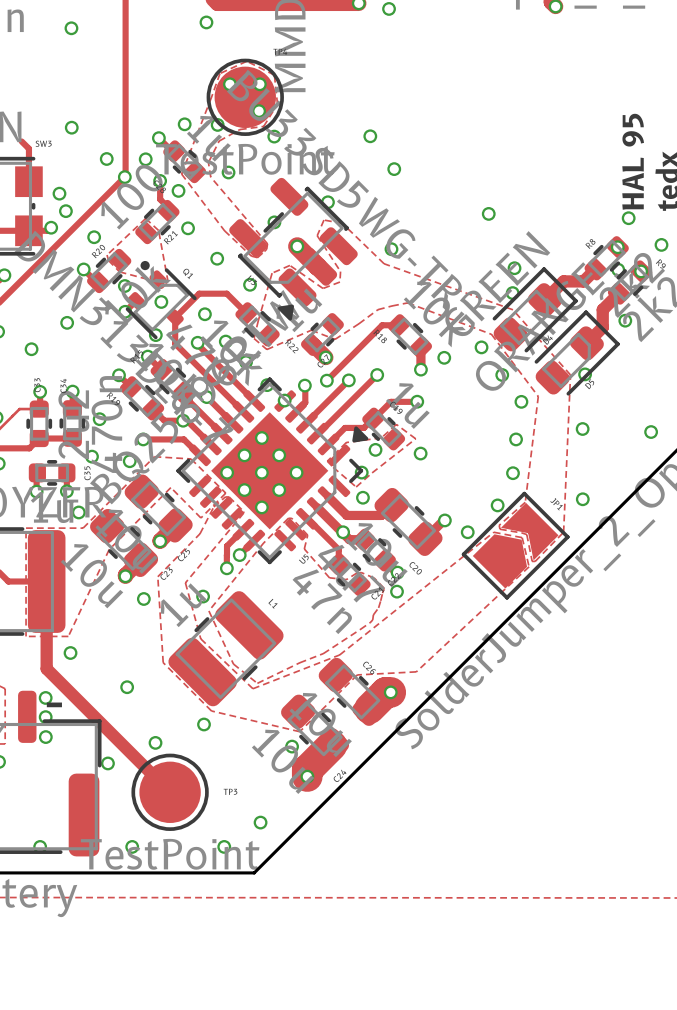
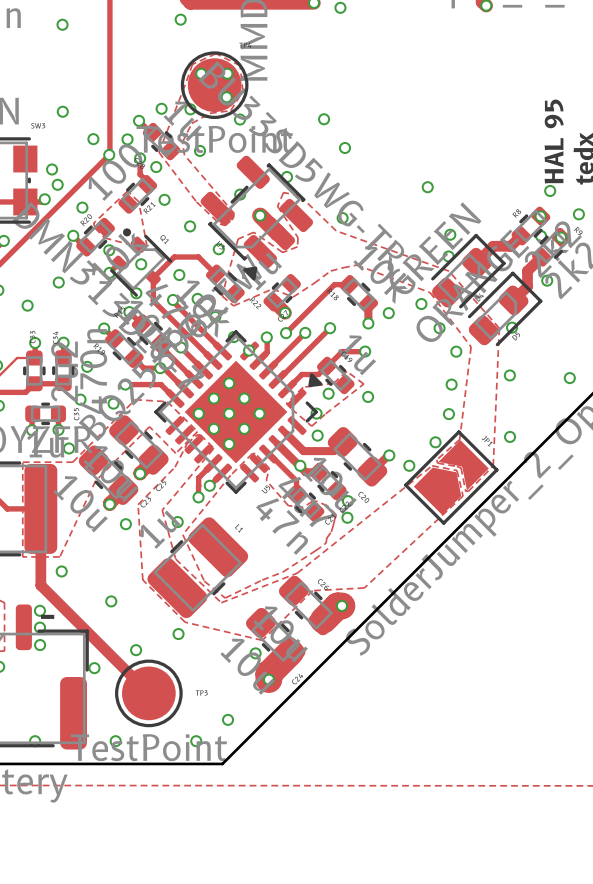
track: (21, 141) (28, 148) (28, 181) -> none

